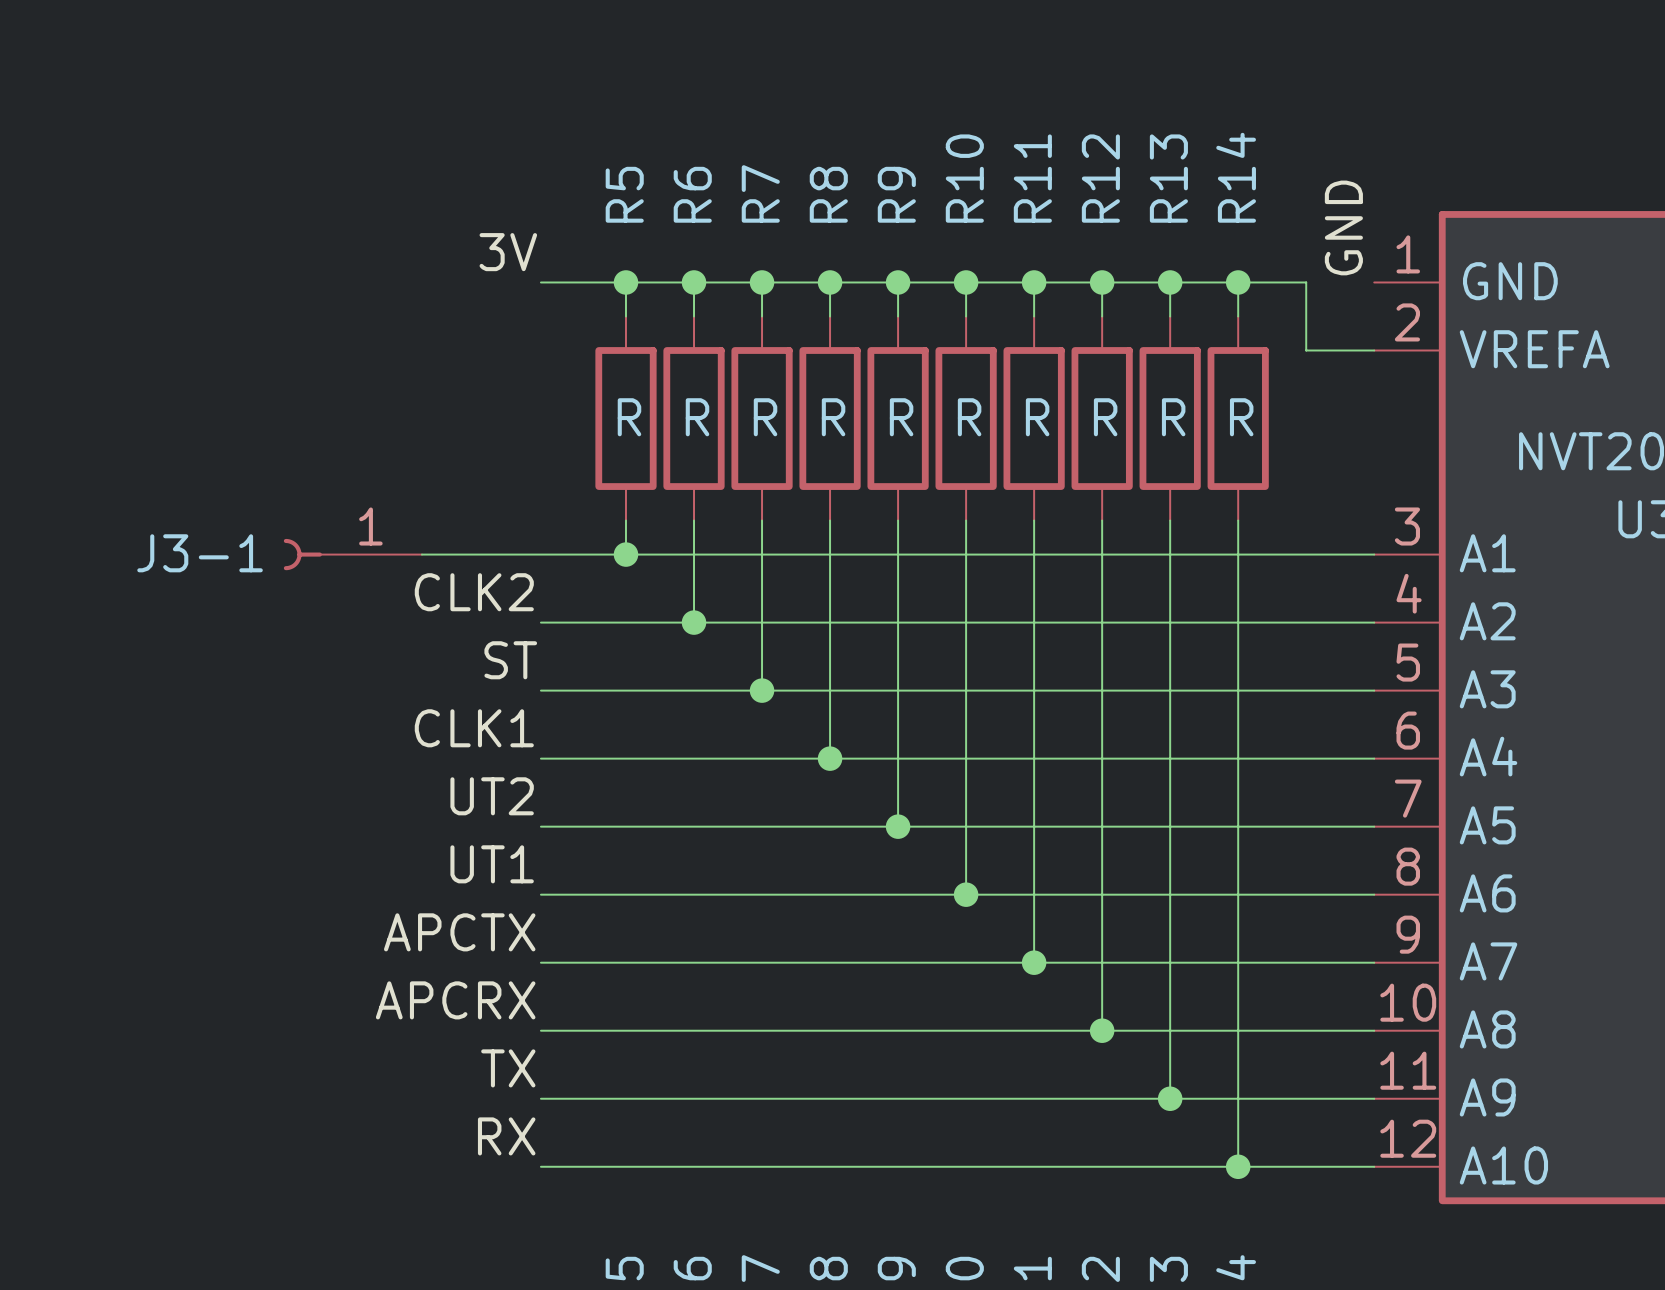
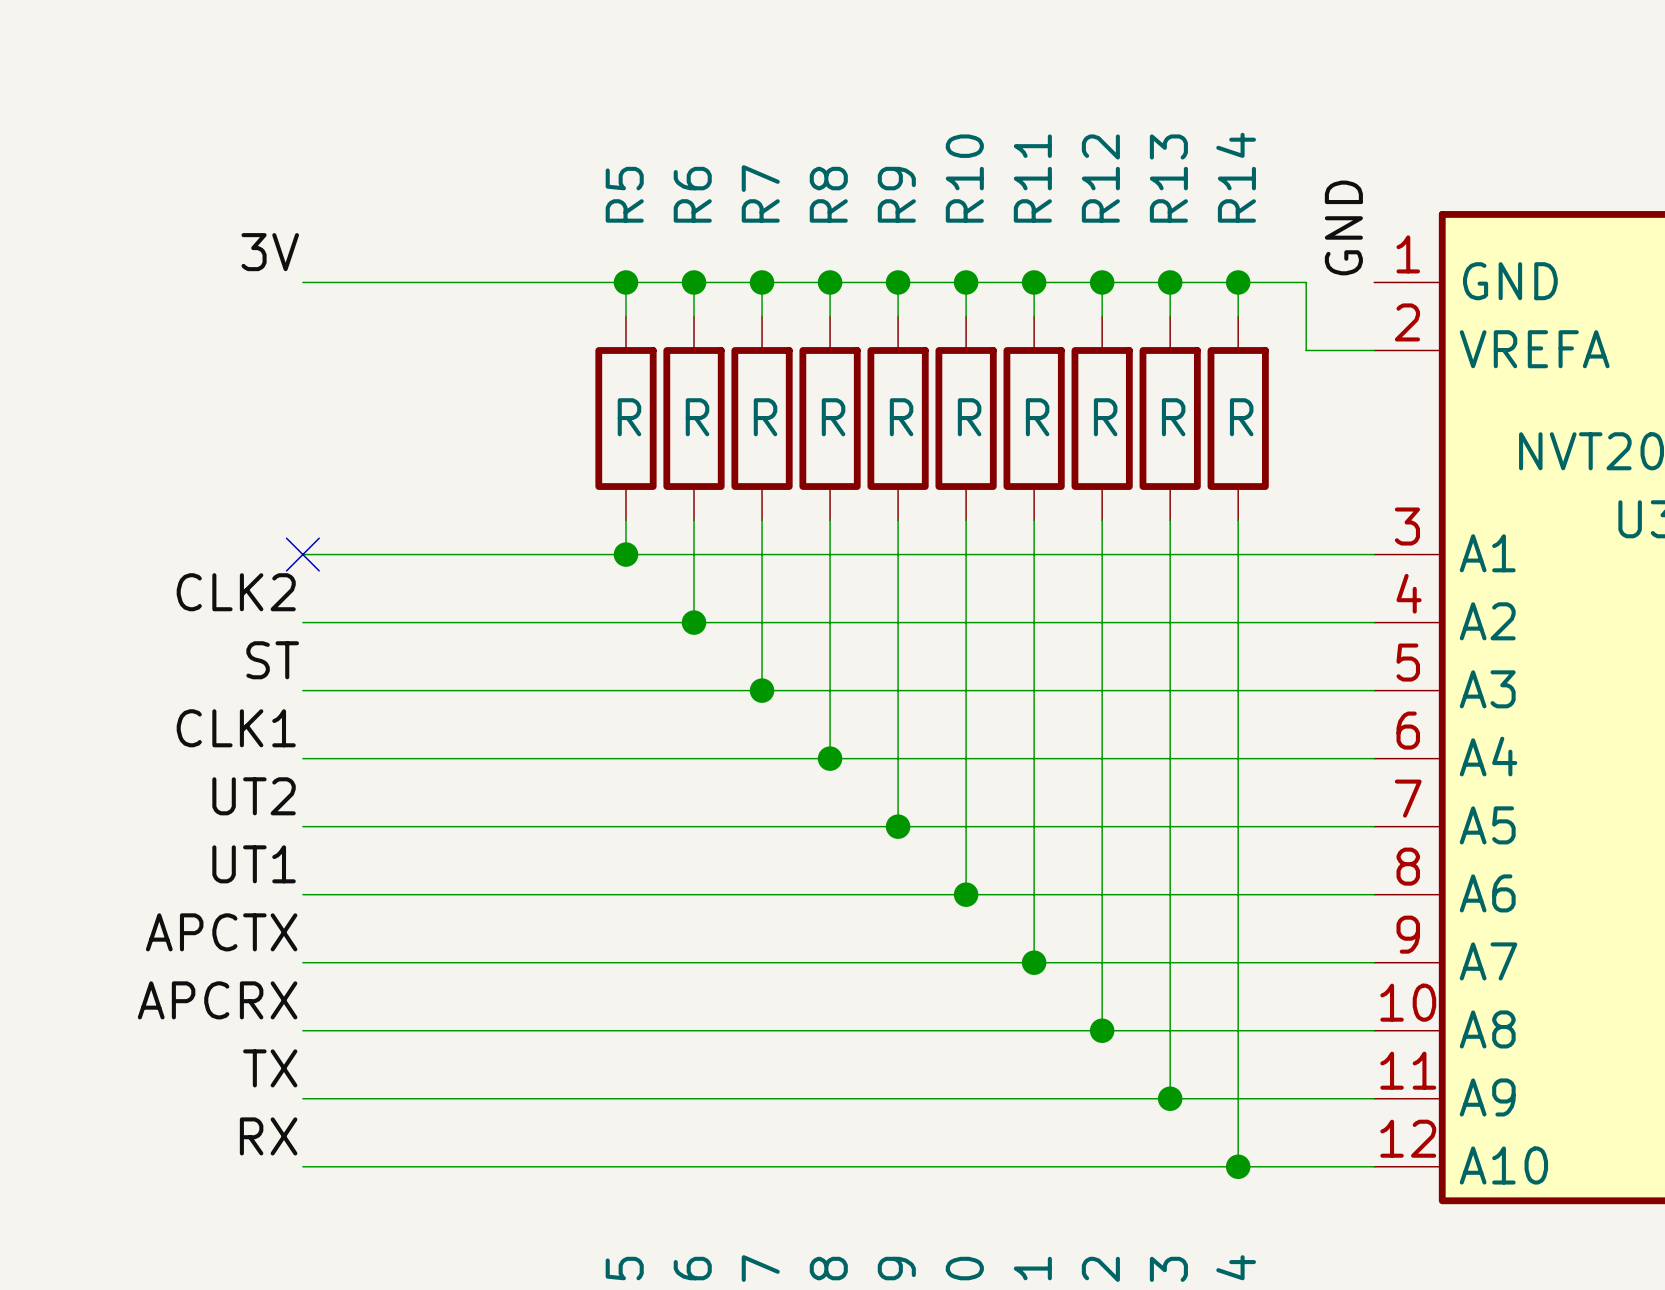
label position: 3V (508, 252) -> 3V (270, 252)
wire: none -> (302, 282) (540, 282)
no-connect mark: none -> (302, 554)
J3-1: (352, 554) -> none
label position: CLK2 (474, 592) -> CLK2 (236, 592)
wire: none -> (302, 622) (540, 622)
label position: ST (510, 660) -> ST (272, 660)
wire: none -> (302, 690) (540, 690)
label position: CLK1 (474, 728) -> CLK1 (236, 728)
wire: none -> (302, 758) (540, 758)
label position: UT2 (492, 796) -> UT2 (254, 796)
wire: none -> (302, 826) (540, 826)
label position: UT1 (492, 864) -> UT1 (254, 864)
wire: none -> (302, 894) (540, 894)
label position: APCTX (459, 932) -> APCTX (221, 932)
wire: none -> (302, 962) (540, 962)
label position: APCRX (455, 1000) -> APCRX (217, 1000)
wire: none -> (302, 1030) (540, 1030)
label position: TX (508, 1068) -> TX (270, 1068)
wire: none -> (302, 1098) (540, 1098)
label position: RX (506, 1136) -> RX (268, 1136)
wire: none -> (302, 1166) (540, 1166)

